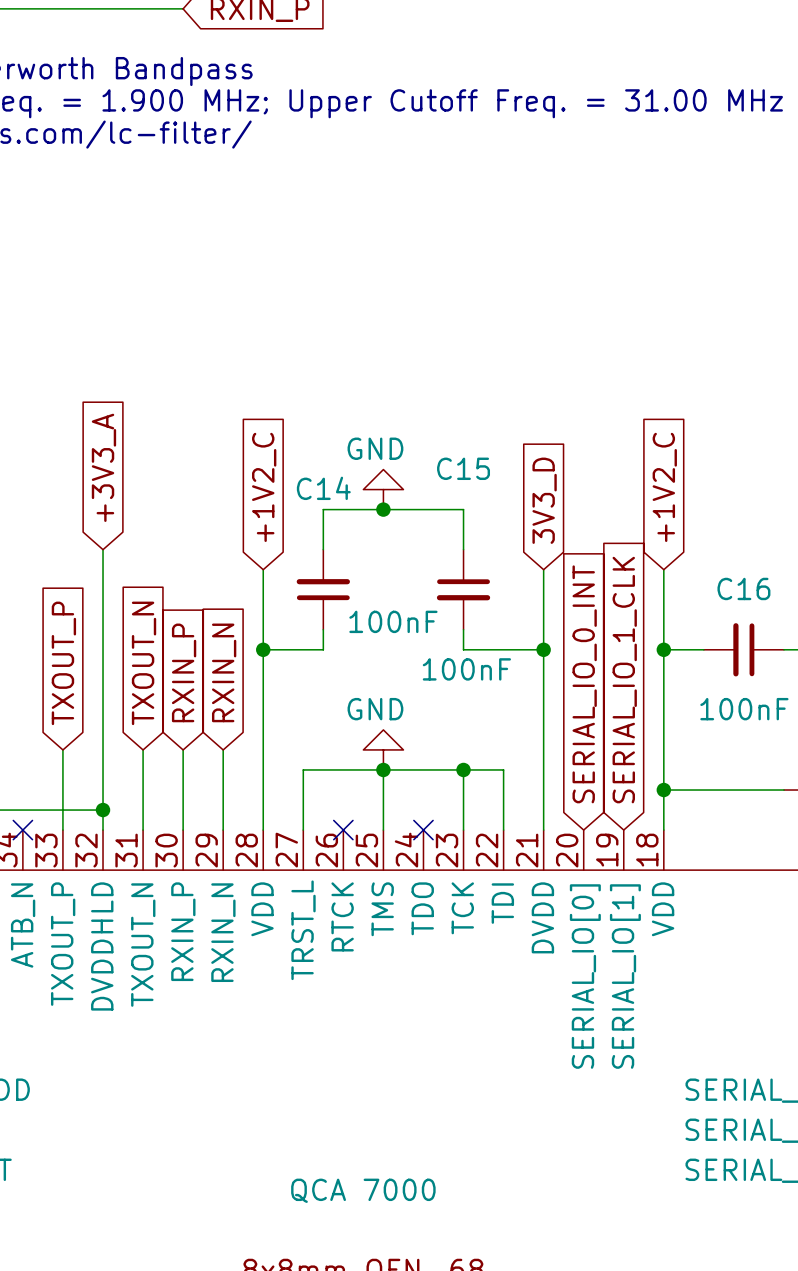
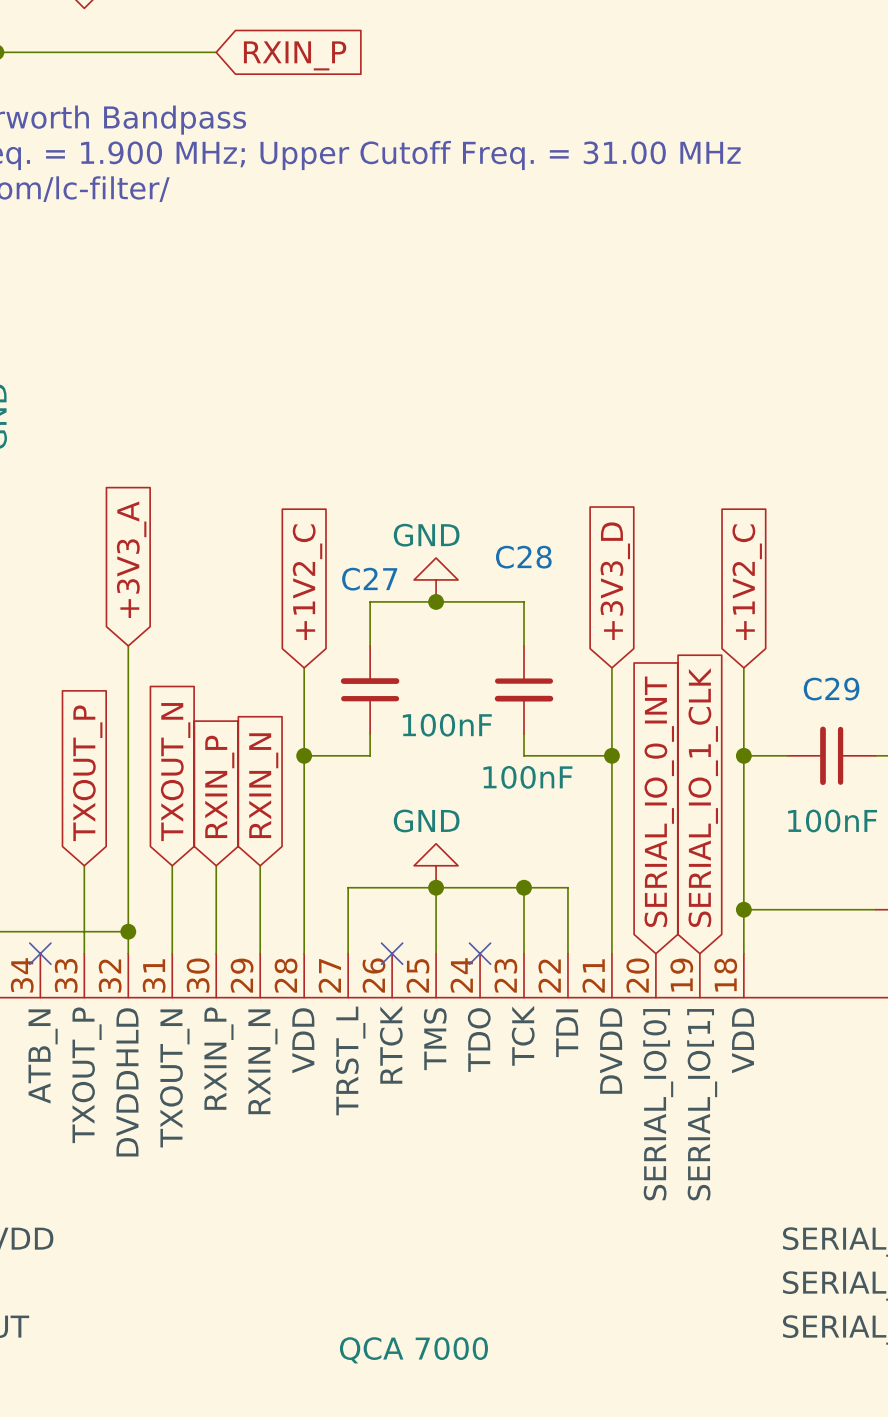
C15 name: C15 (463, 468) -> C28 (523, 557)
C14 name: C14 (323, 488) -> C27 (369, 579)
global label: 3V3_D (544, 500) -> +3V3_D (615, 581)
C16 name: C16 (743, 588) -> C29 (831, 689)

